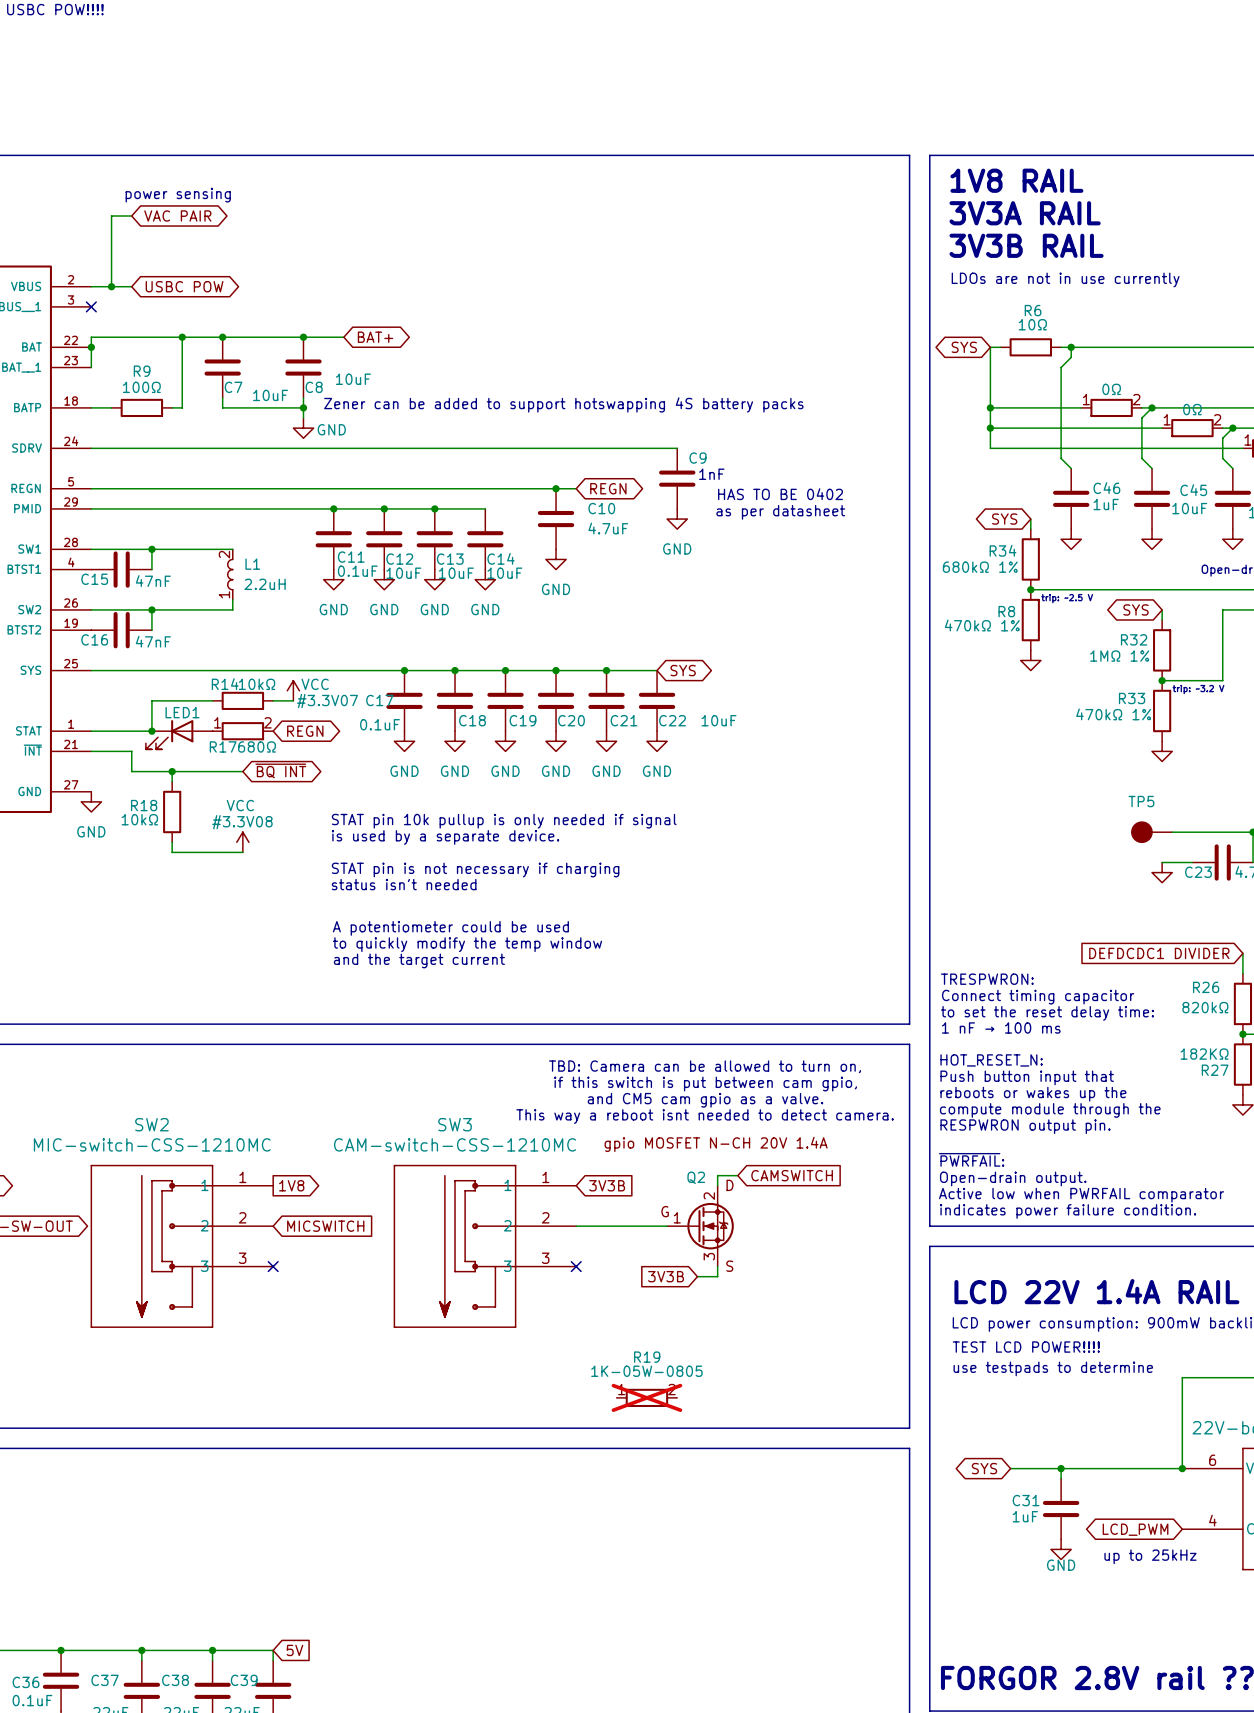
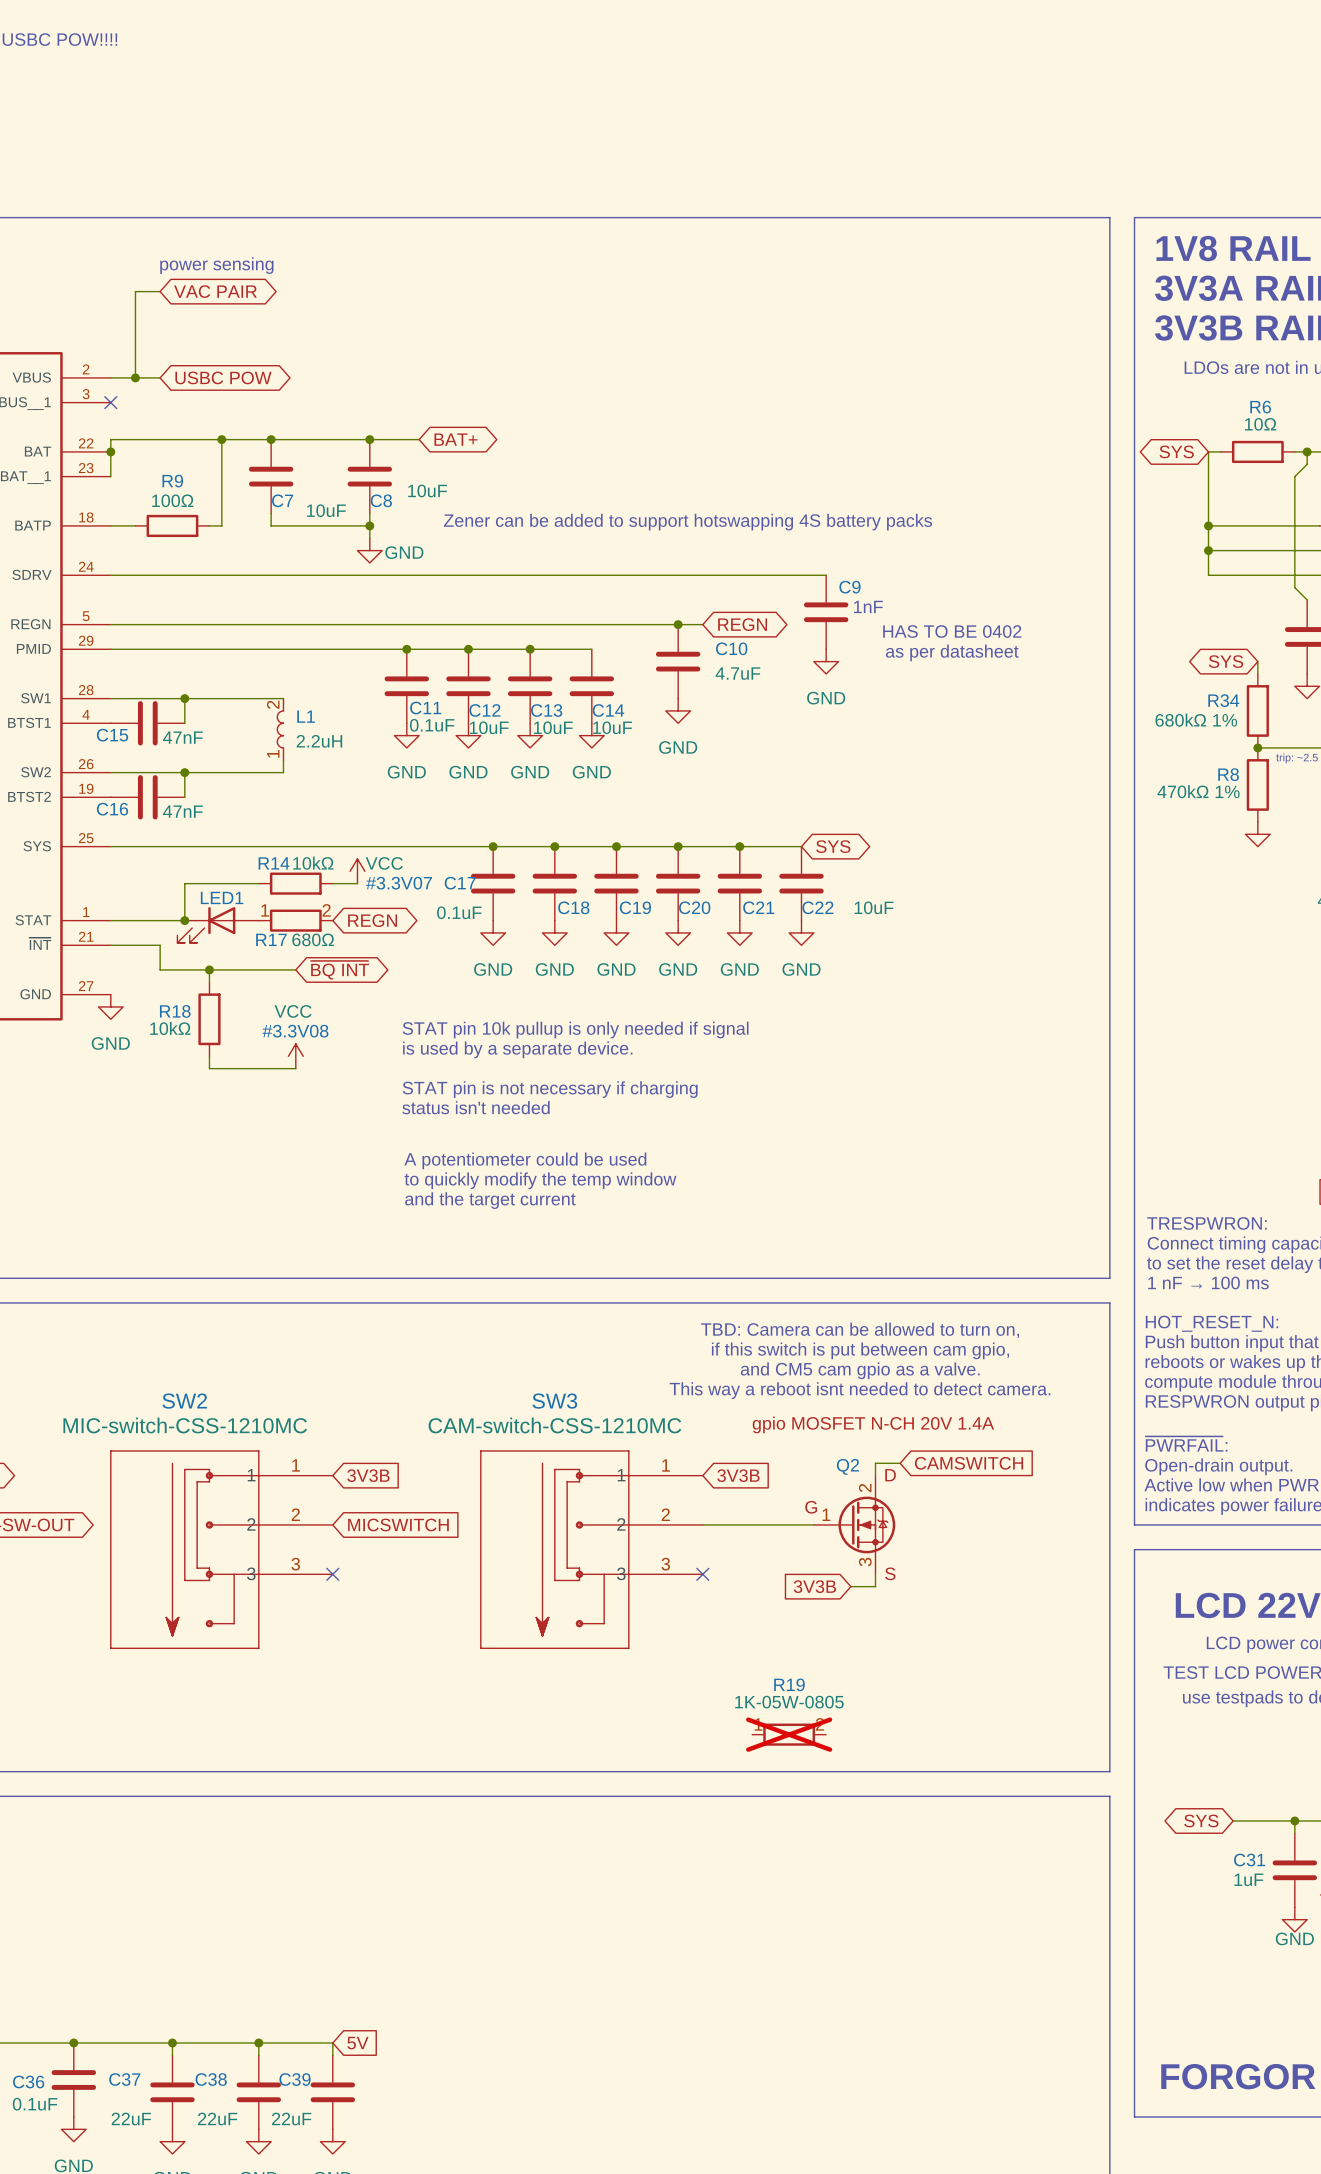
global label shape: output (291, 1185) -> input (368, 1475)
global label: 1V8 (291, 1185) -> 3V3B (368, 1475)

